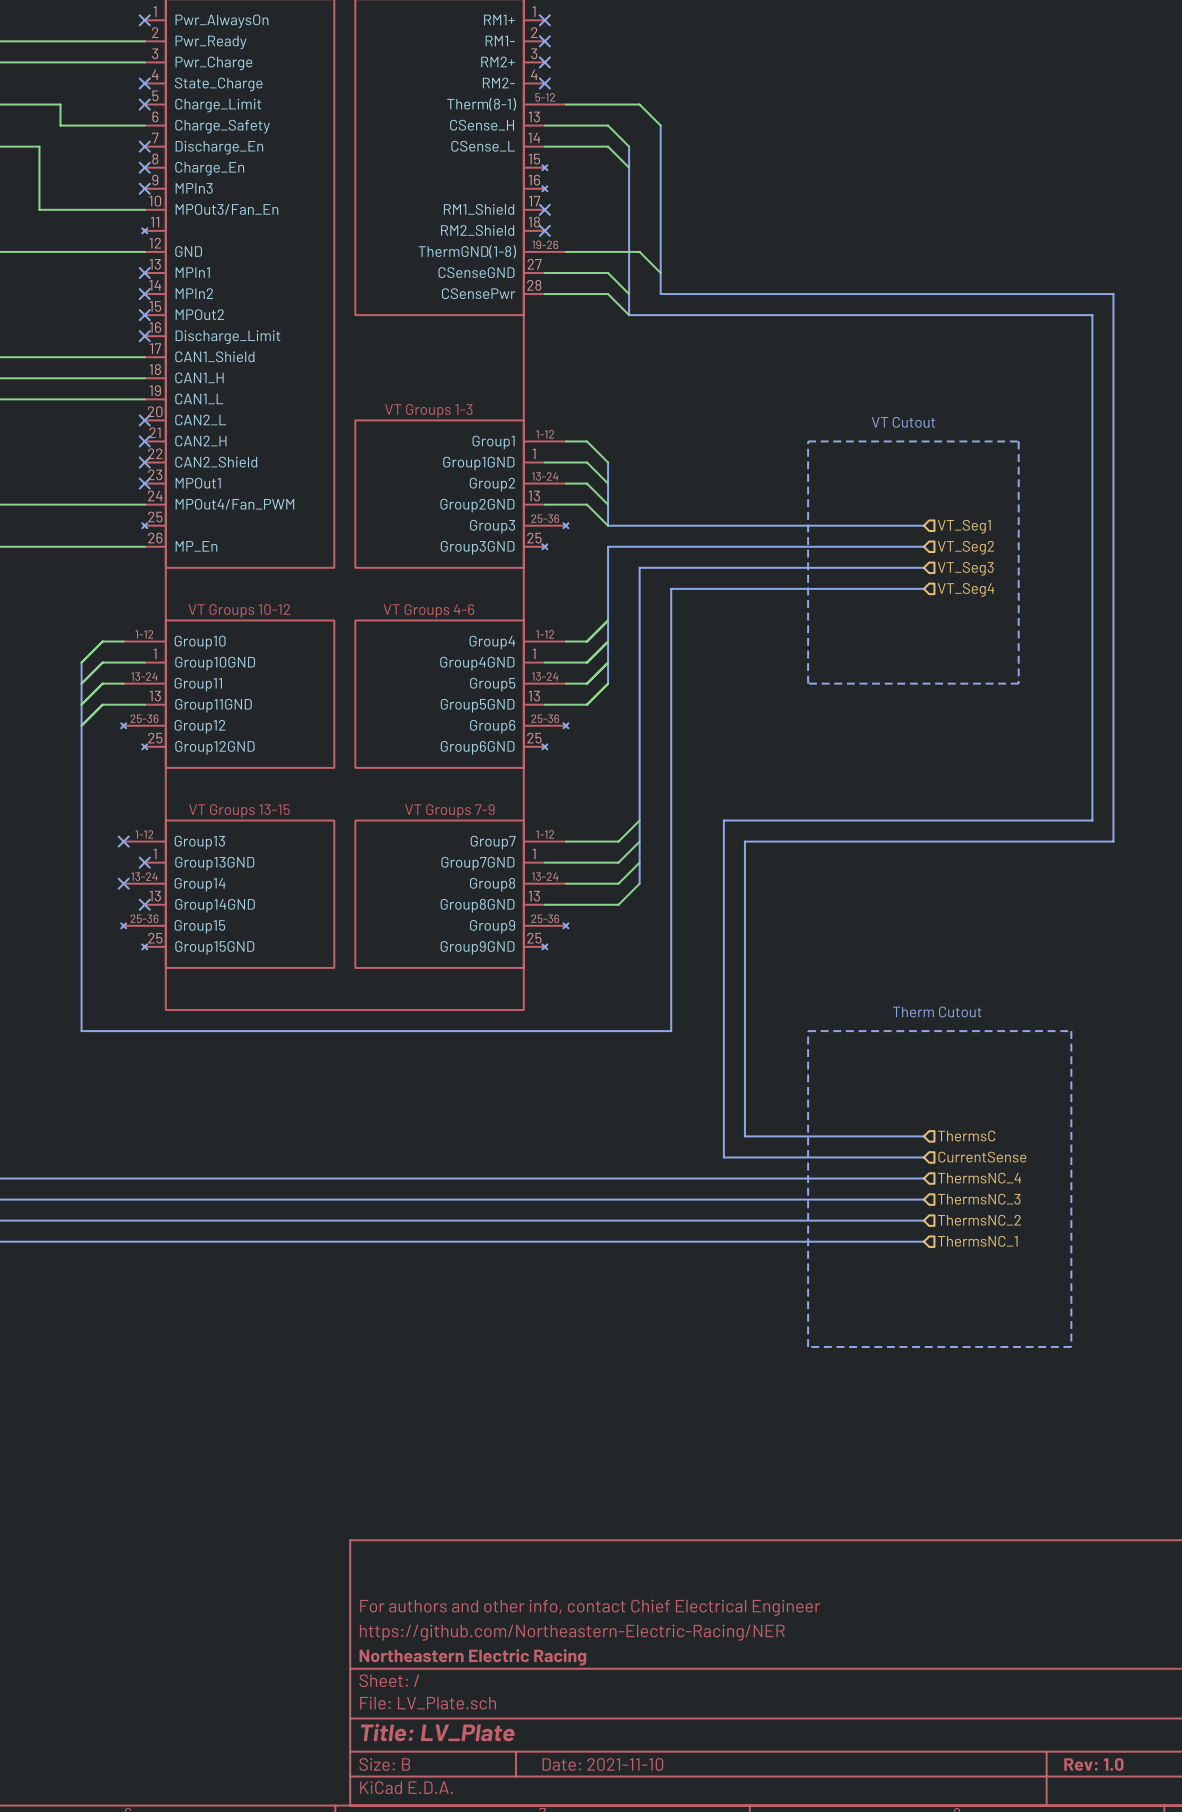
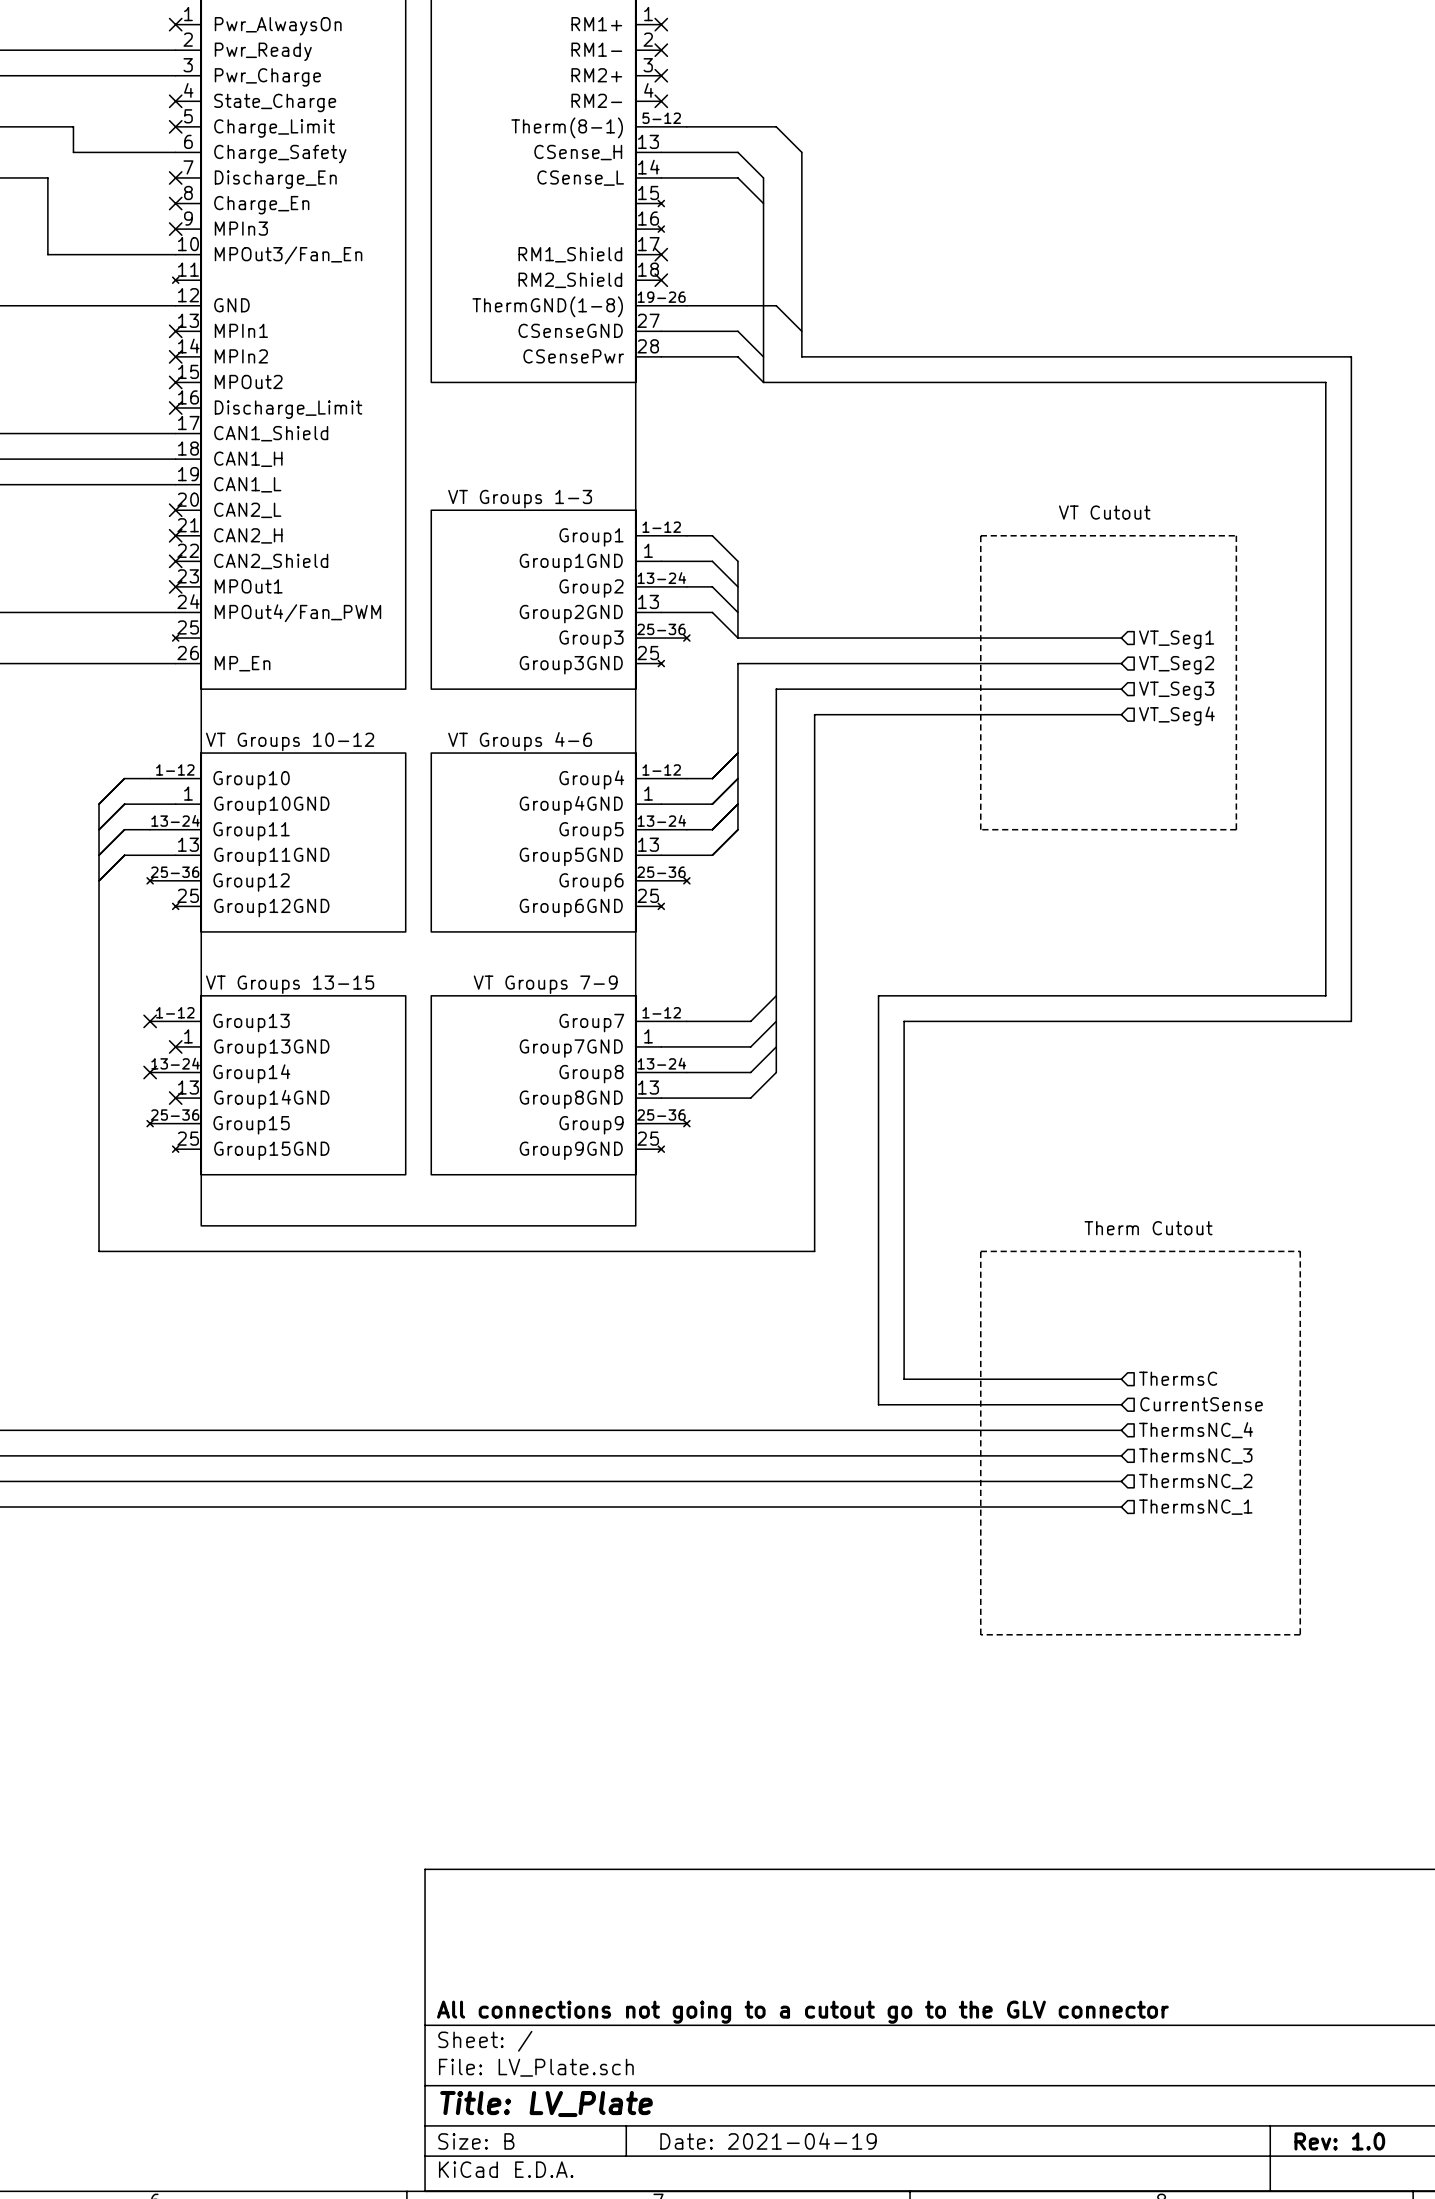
title block: For authors and other info, contact Chief Electrical Engineer (590, 1607) -> none
title block: https://github.com/Northeastern-Electric-Racing/NER (572, 1632) -> none
title block: Northeastern Electric Racing (472, 1657) -> All connections not going to a cutout go to the GLV connector (802, 2012)
title block: Date: 2021-11-10 (602, 1764) -> Date: 2021-04-19 (768, 2141)

